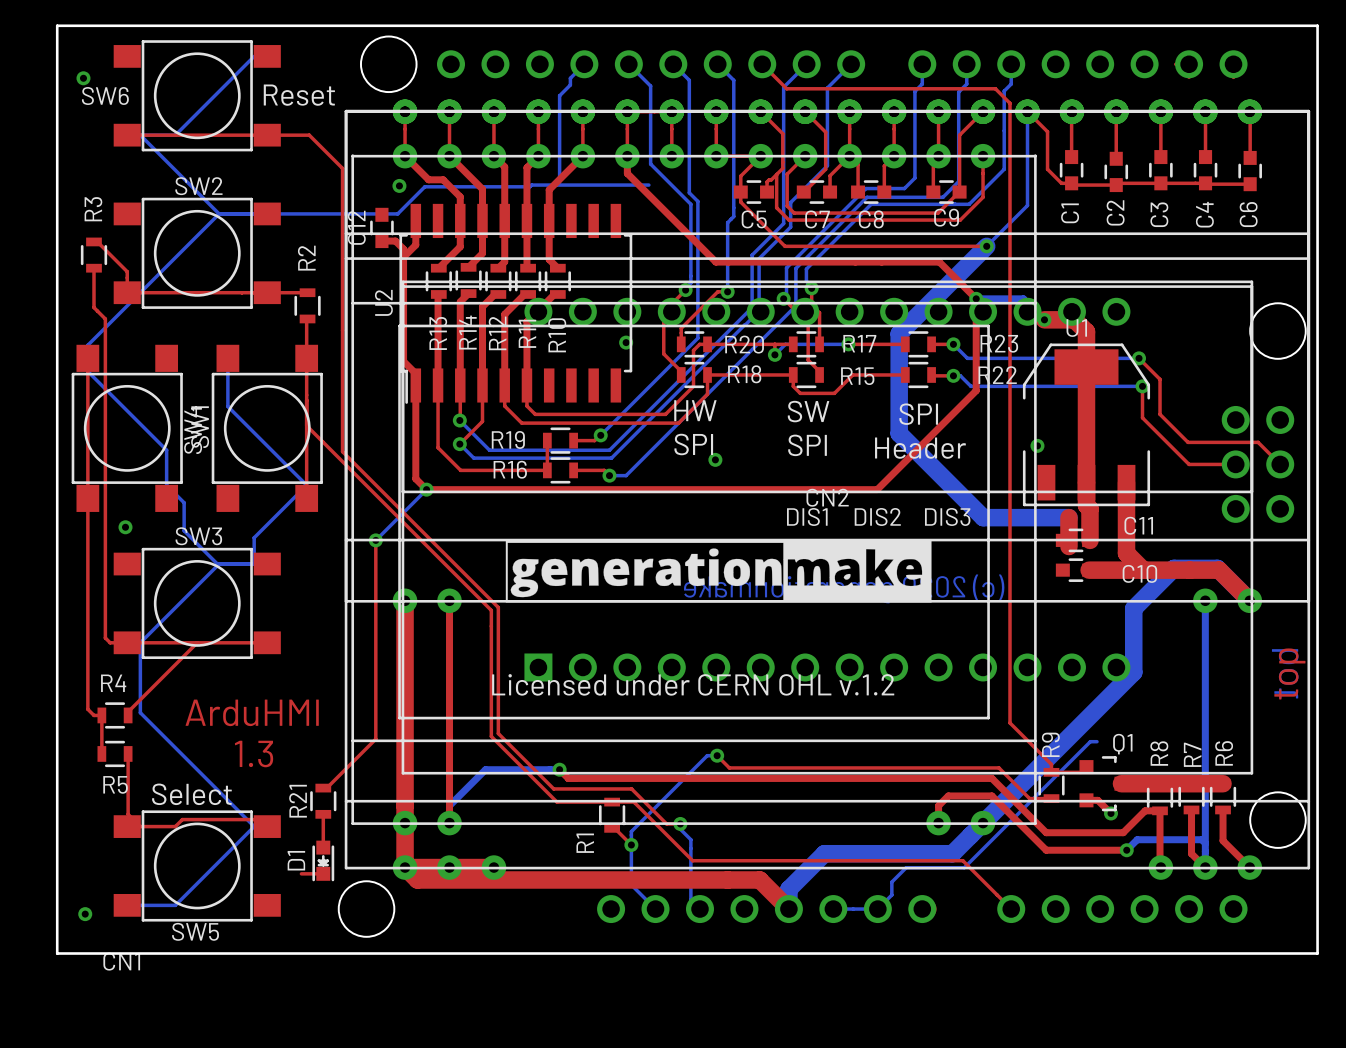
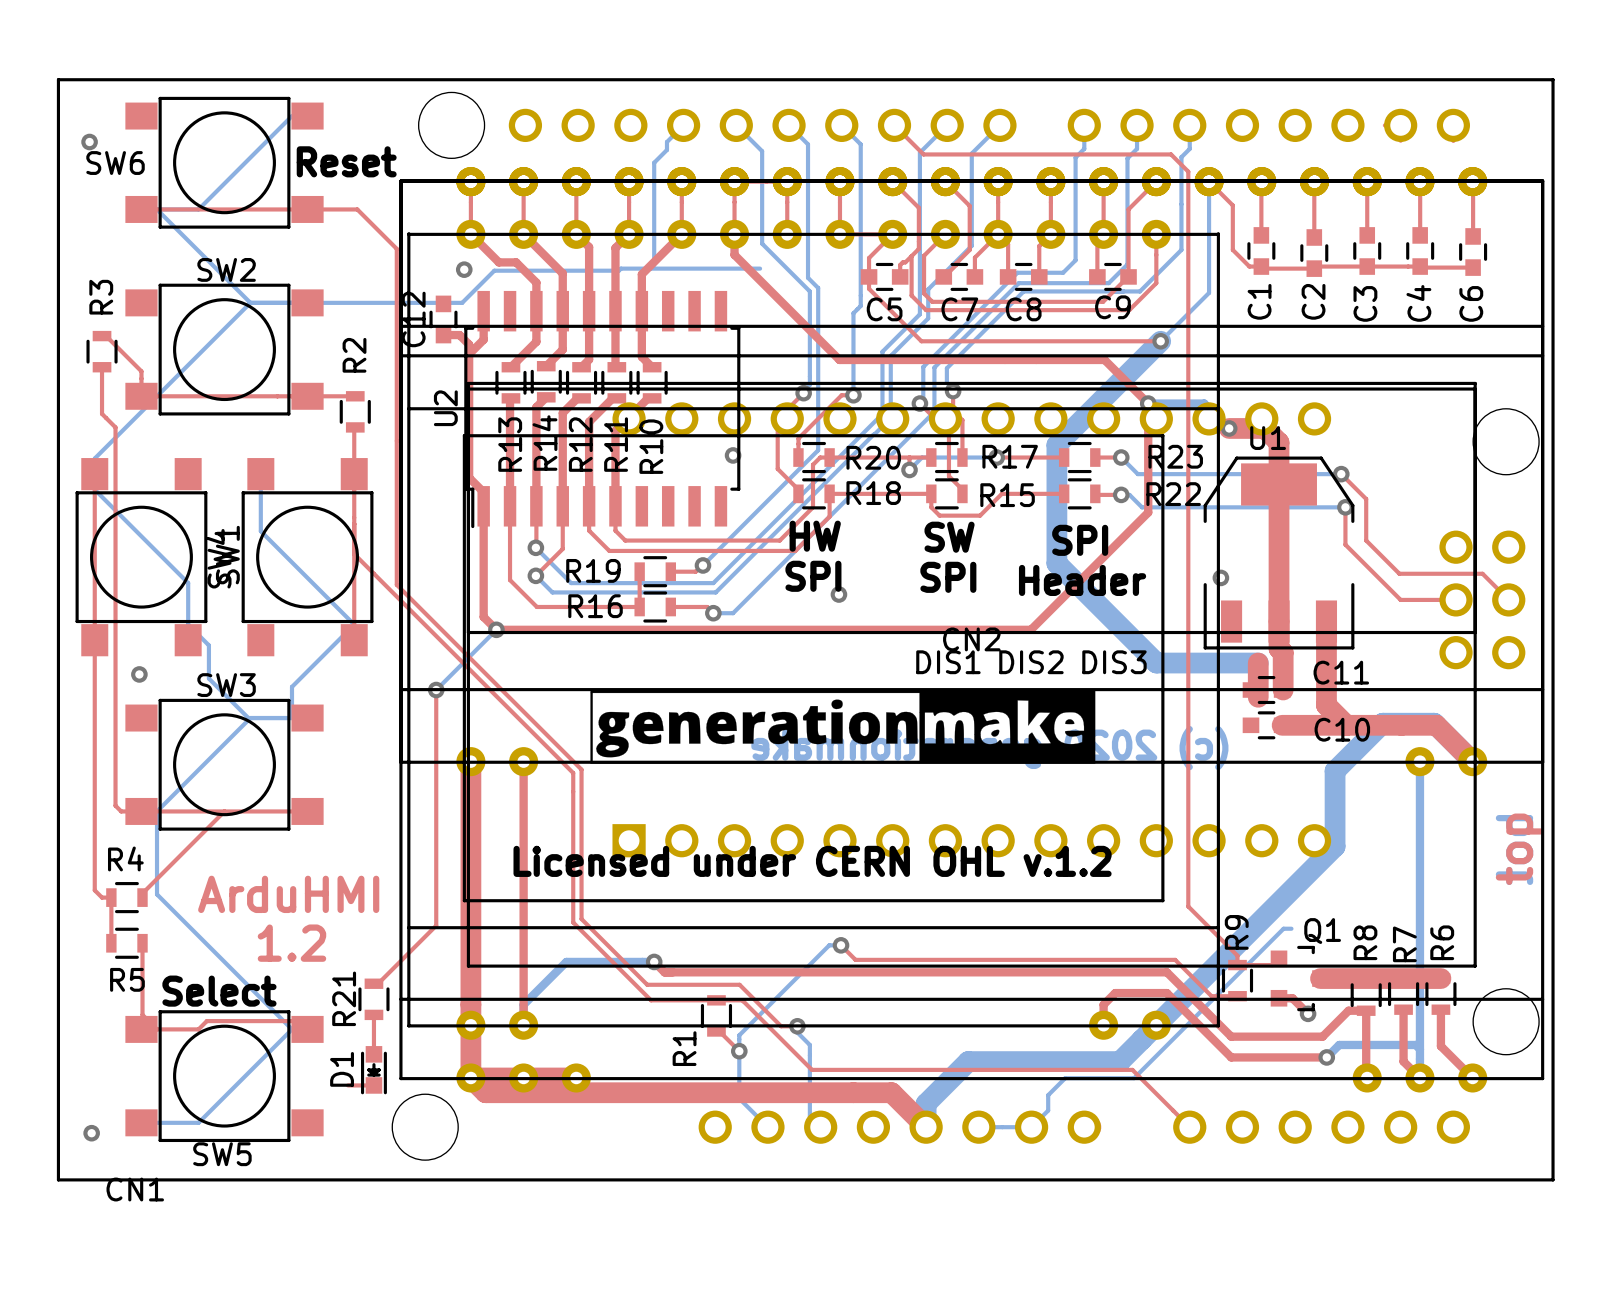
text: 1.3 (254, 753) -> 1.2 (291, 943)

